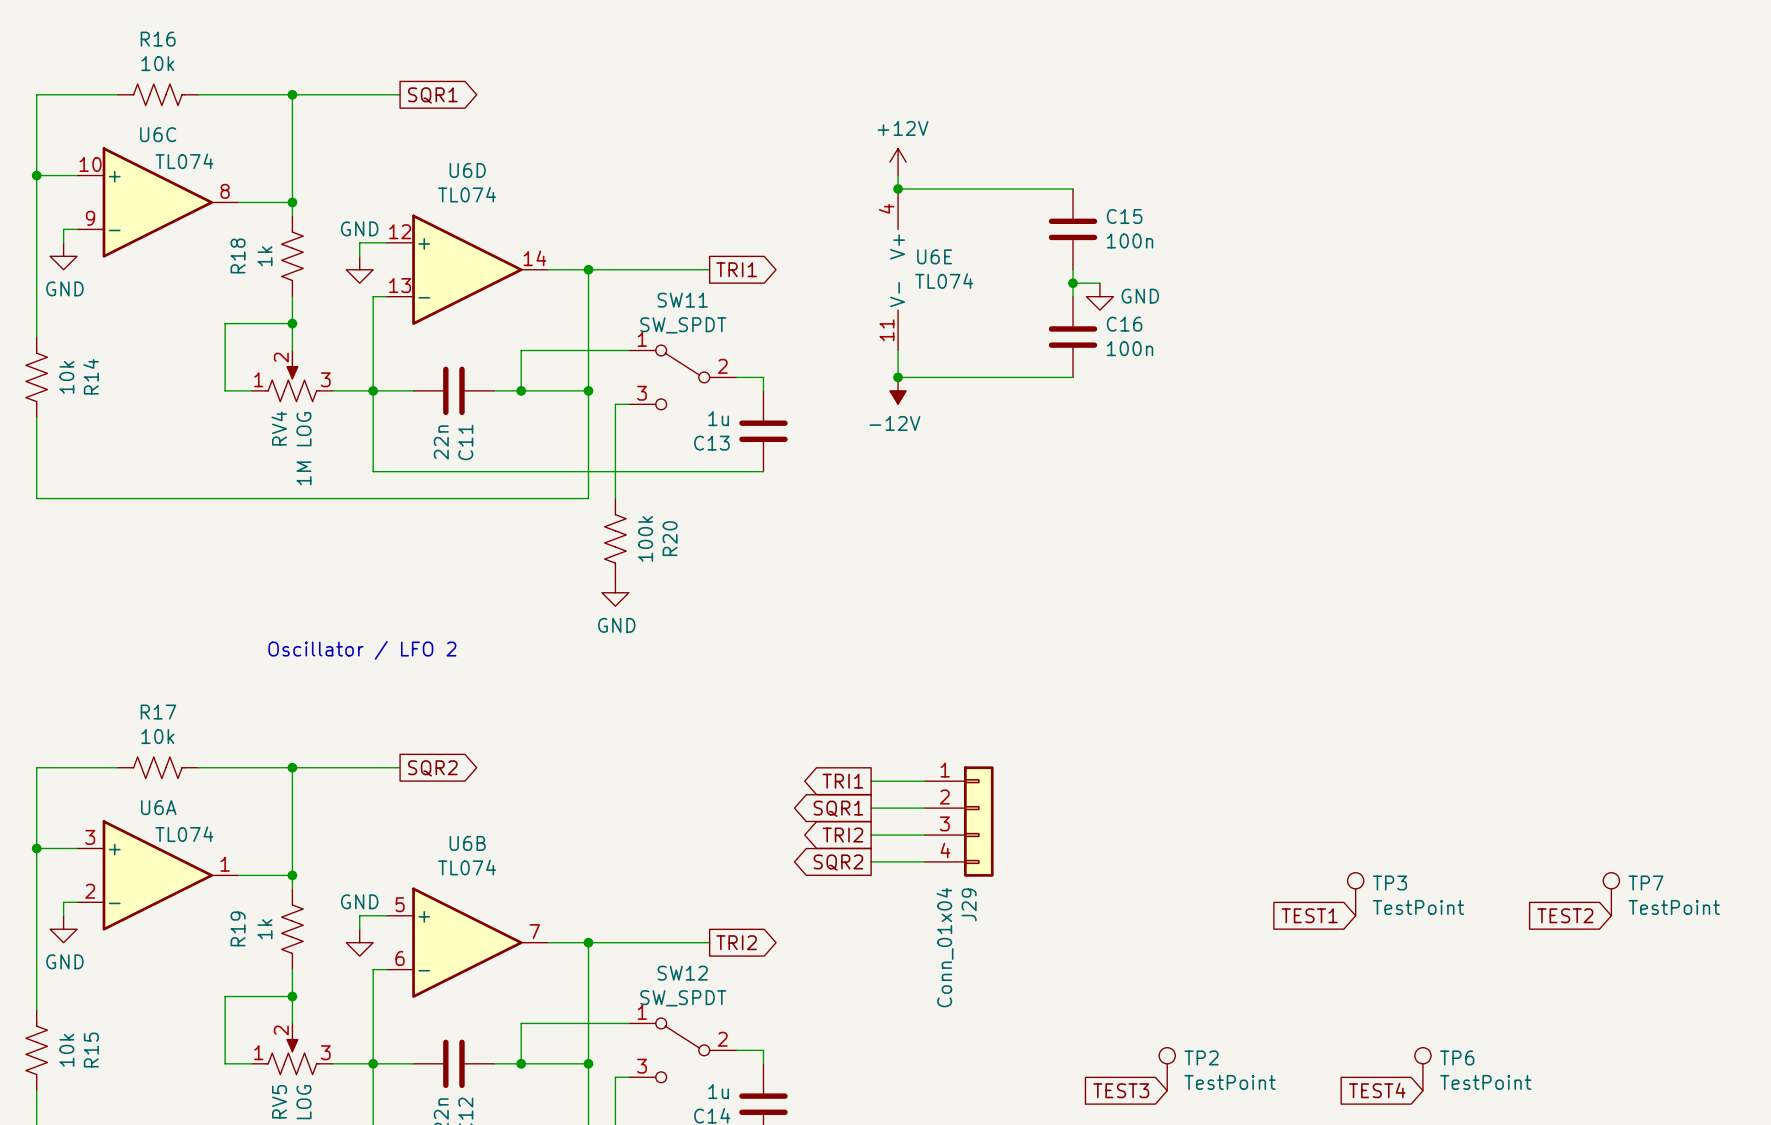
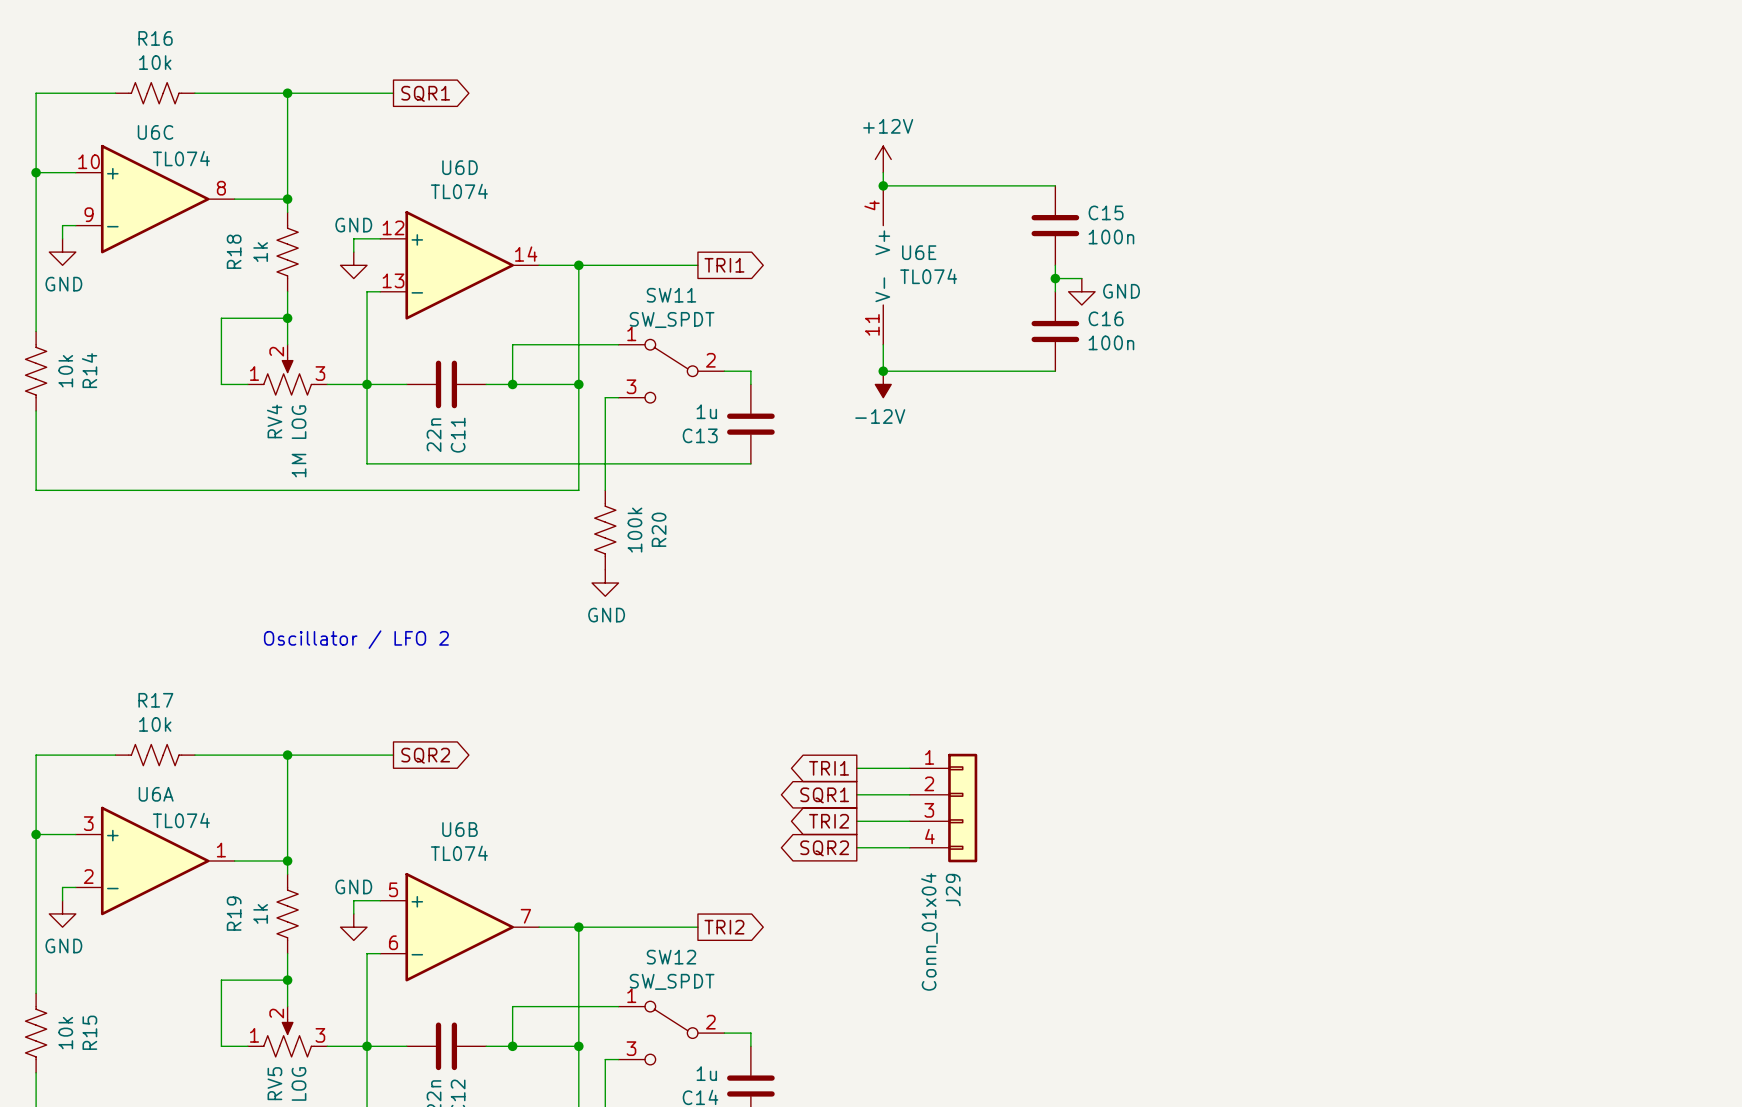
TP3: TestPoint (1355, 894) -> none
TP7: TestPoint (1611, 894) -> none
global label: TEST1 (1309, 915) -> none
global label: TEST2 (1565, 915) -> none
TP2: TestPoint (1167, 1069) -> none
TP6: TestPoint (1422, 1069) -> none
global label: TEST3 (1121, 1090) -> none
global label: TEST4 (1377, 1090) -> none

